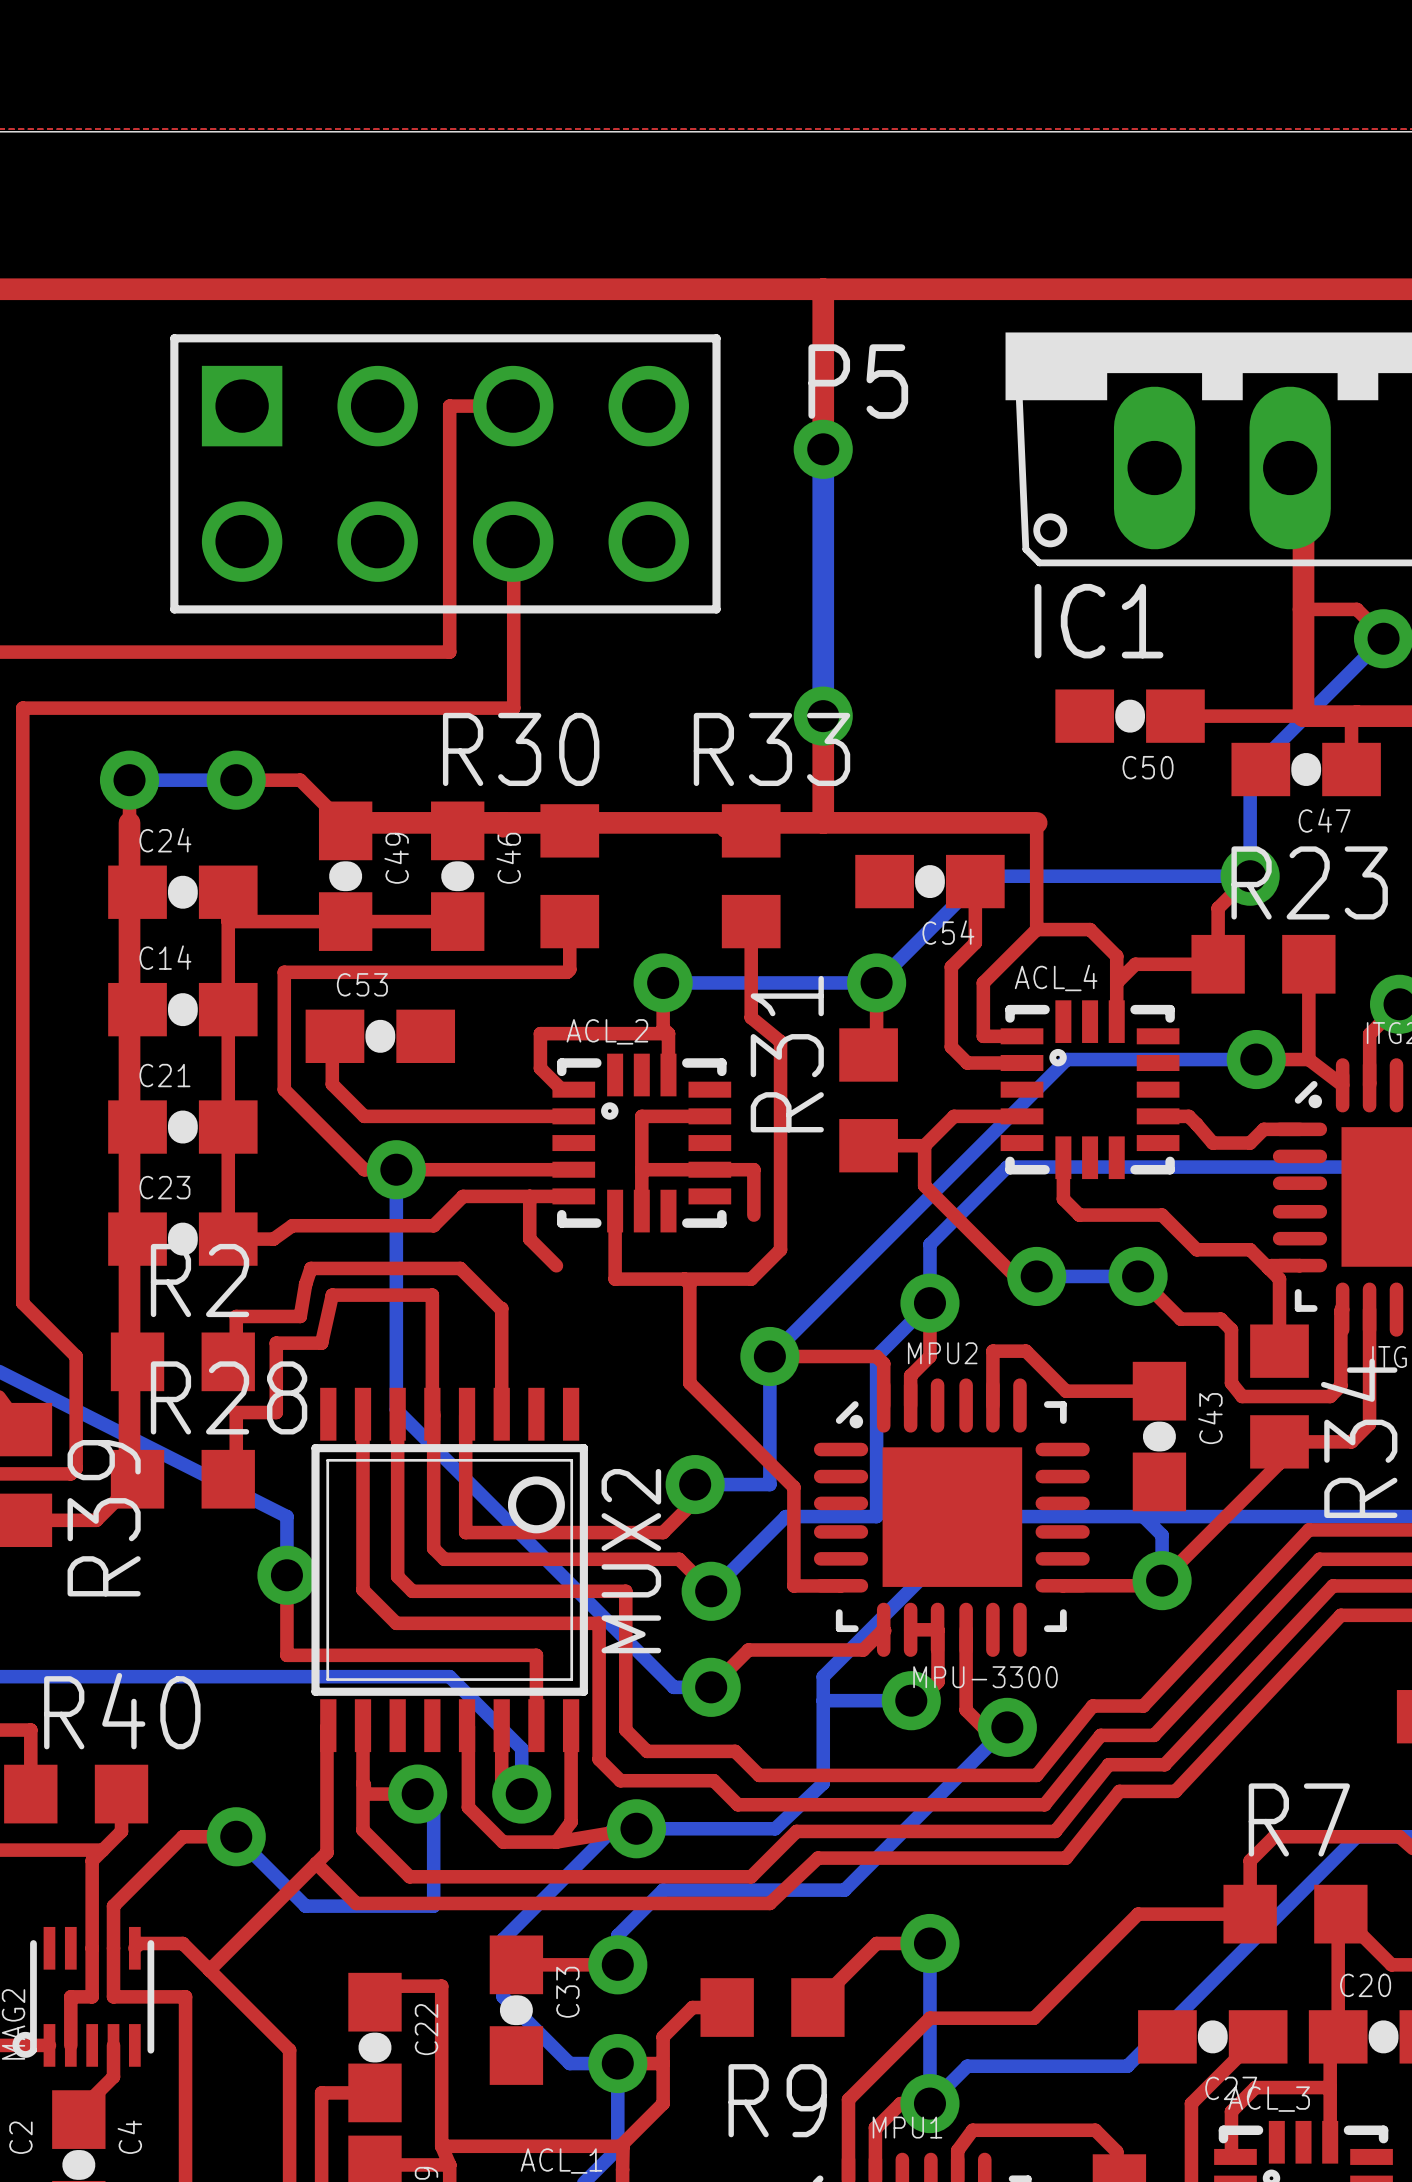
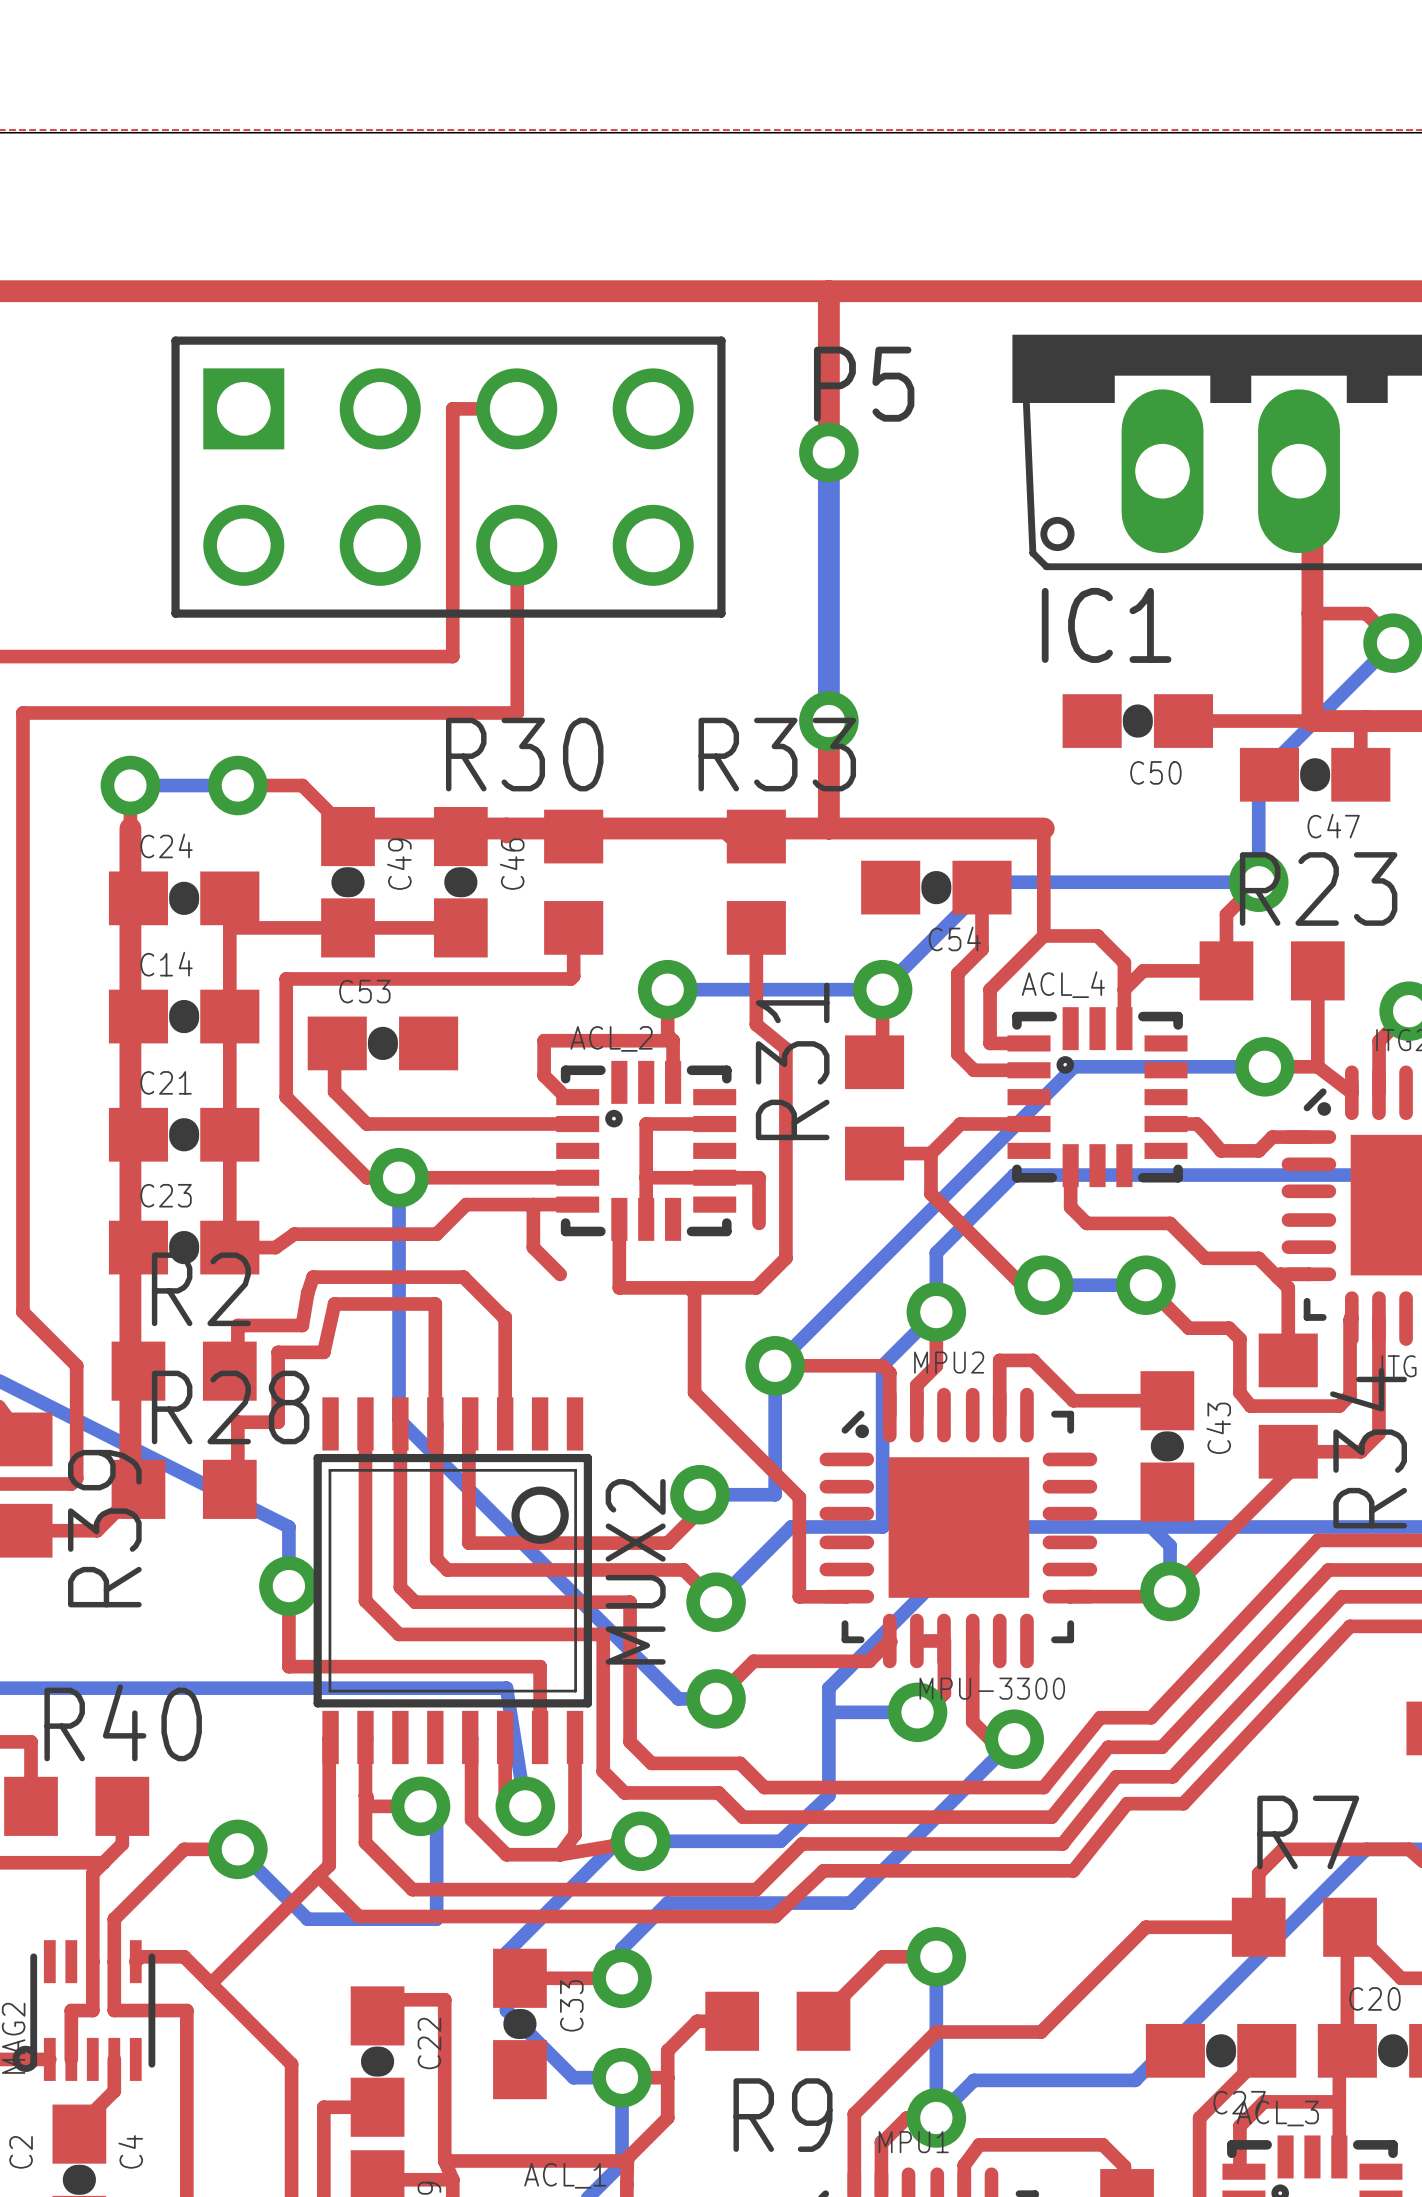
bottom track: (449, 1676) (521, 1748) (521, 1794) -> (452, 1688) (506, 1688) (525, 1806)

